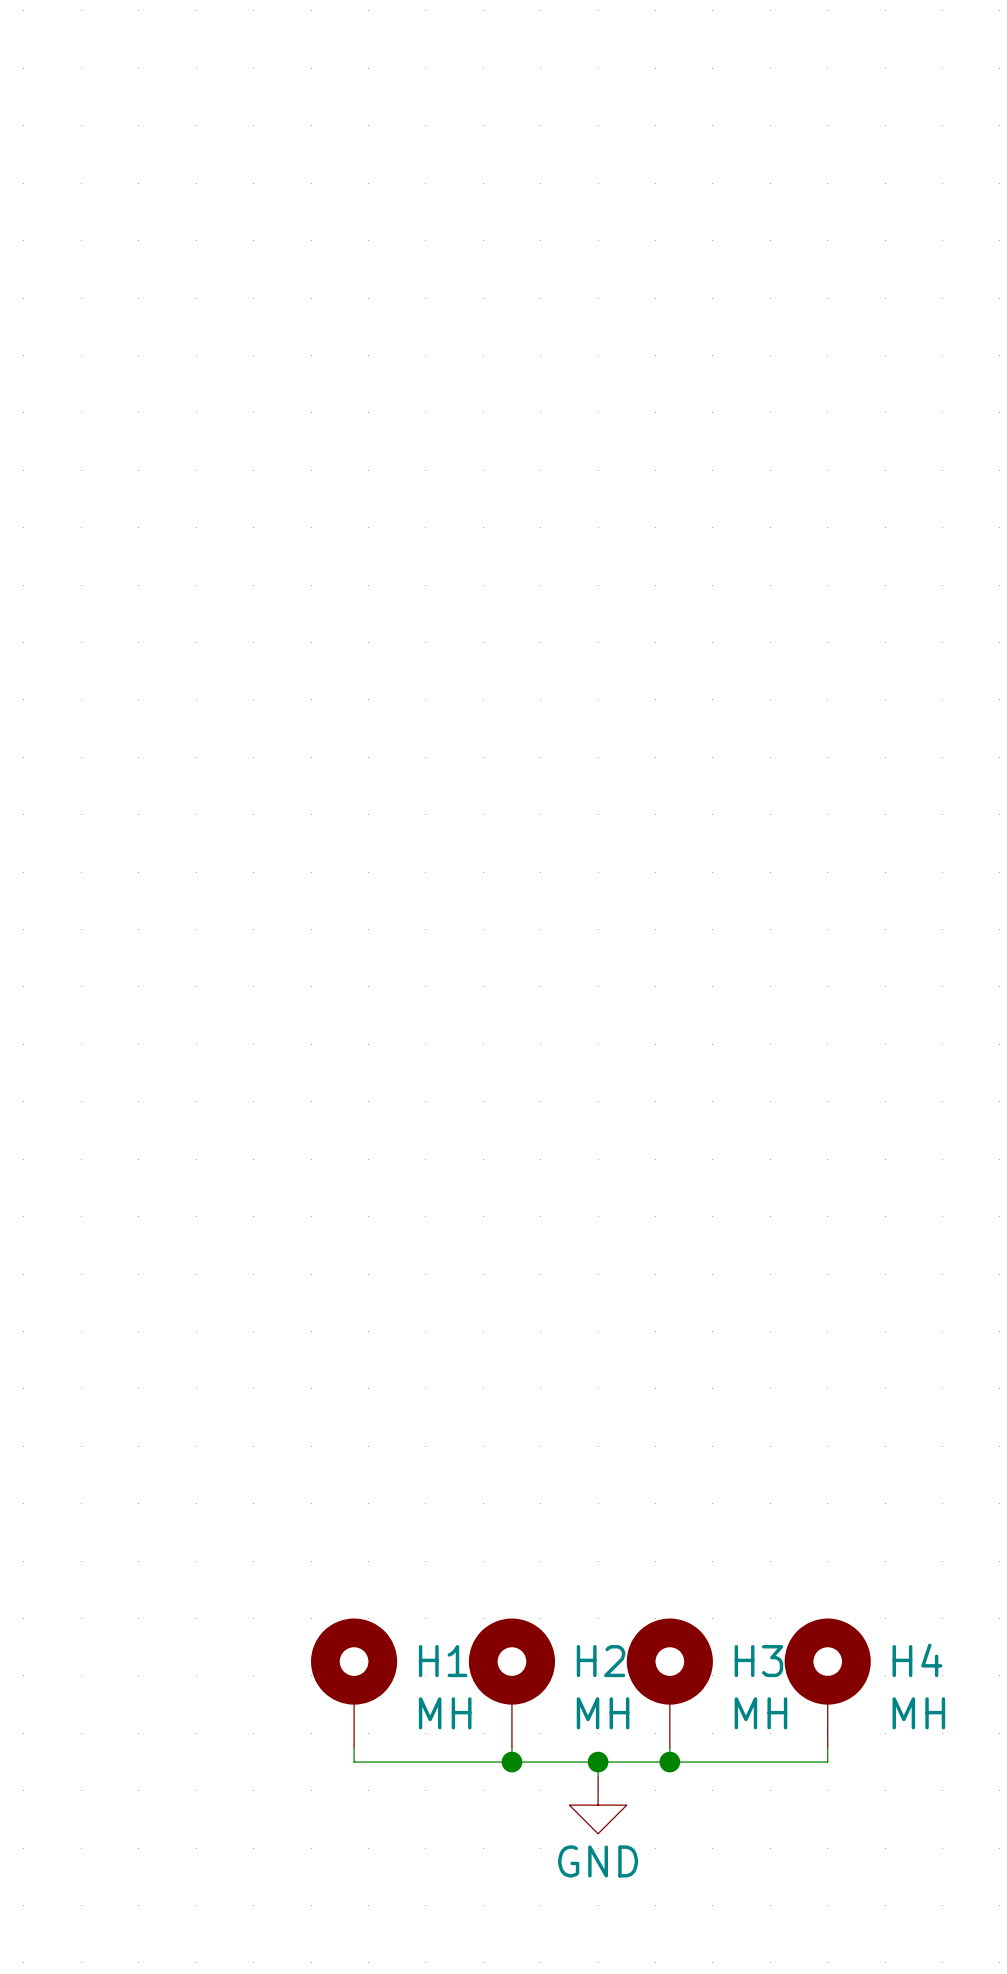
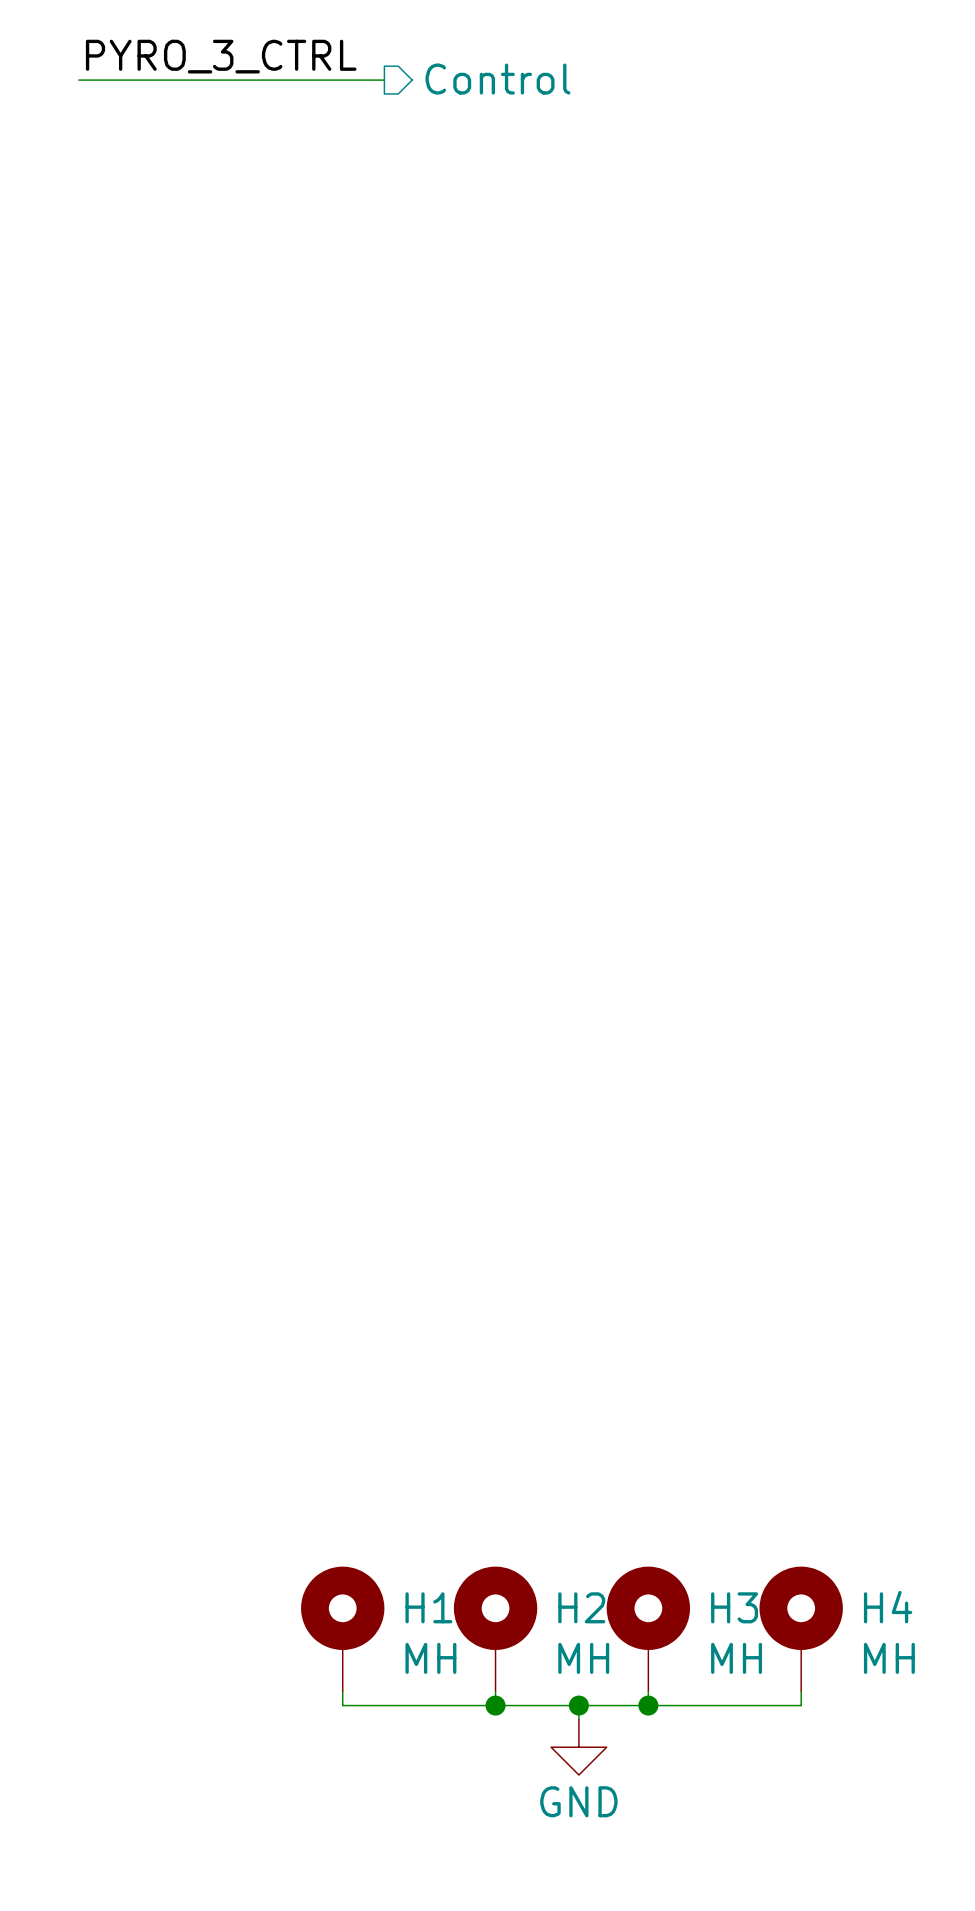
label: none -> PYRO_3_CTRL (221, 56)
sheet pin: none -> Control (497, 79)
wire: none -> (78, 80) (384, 80)

